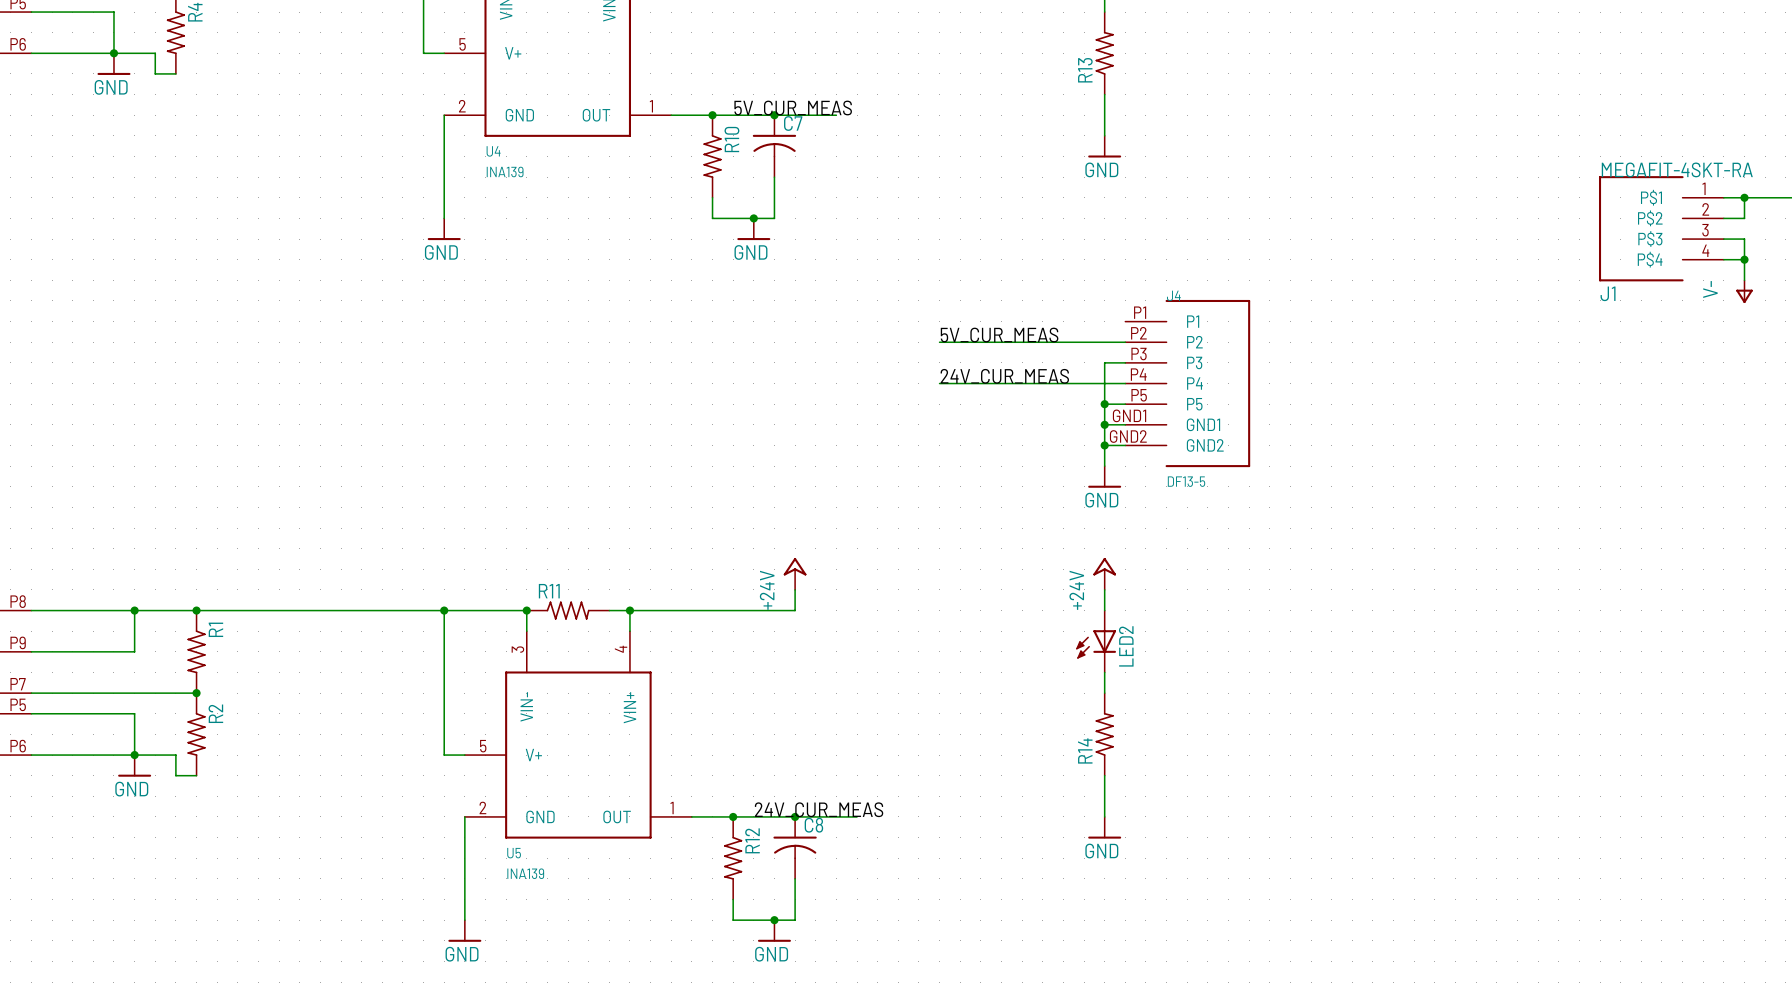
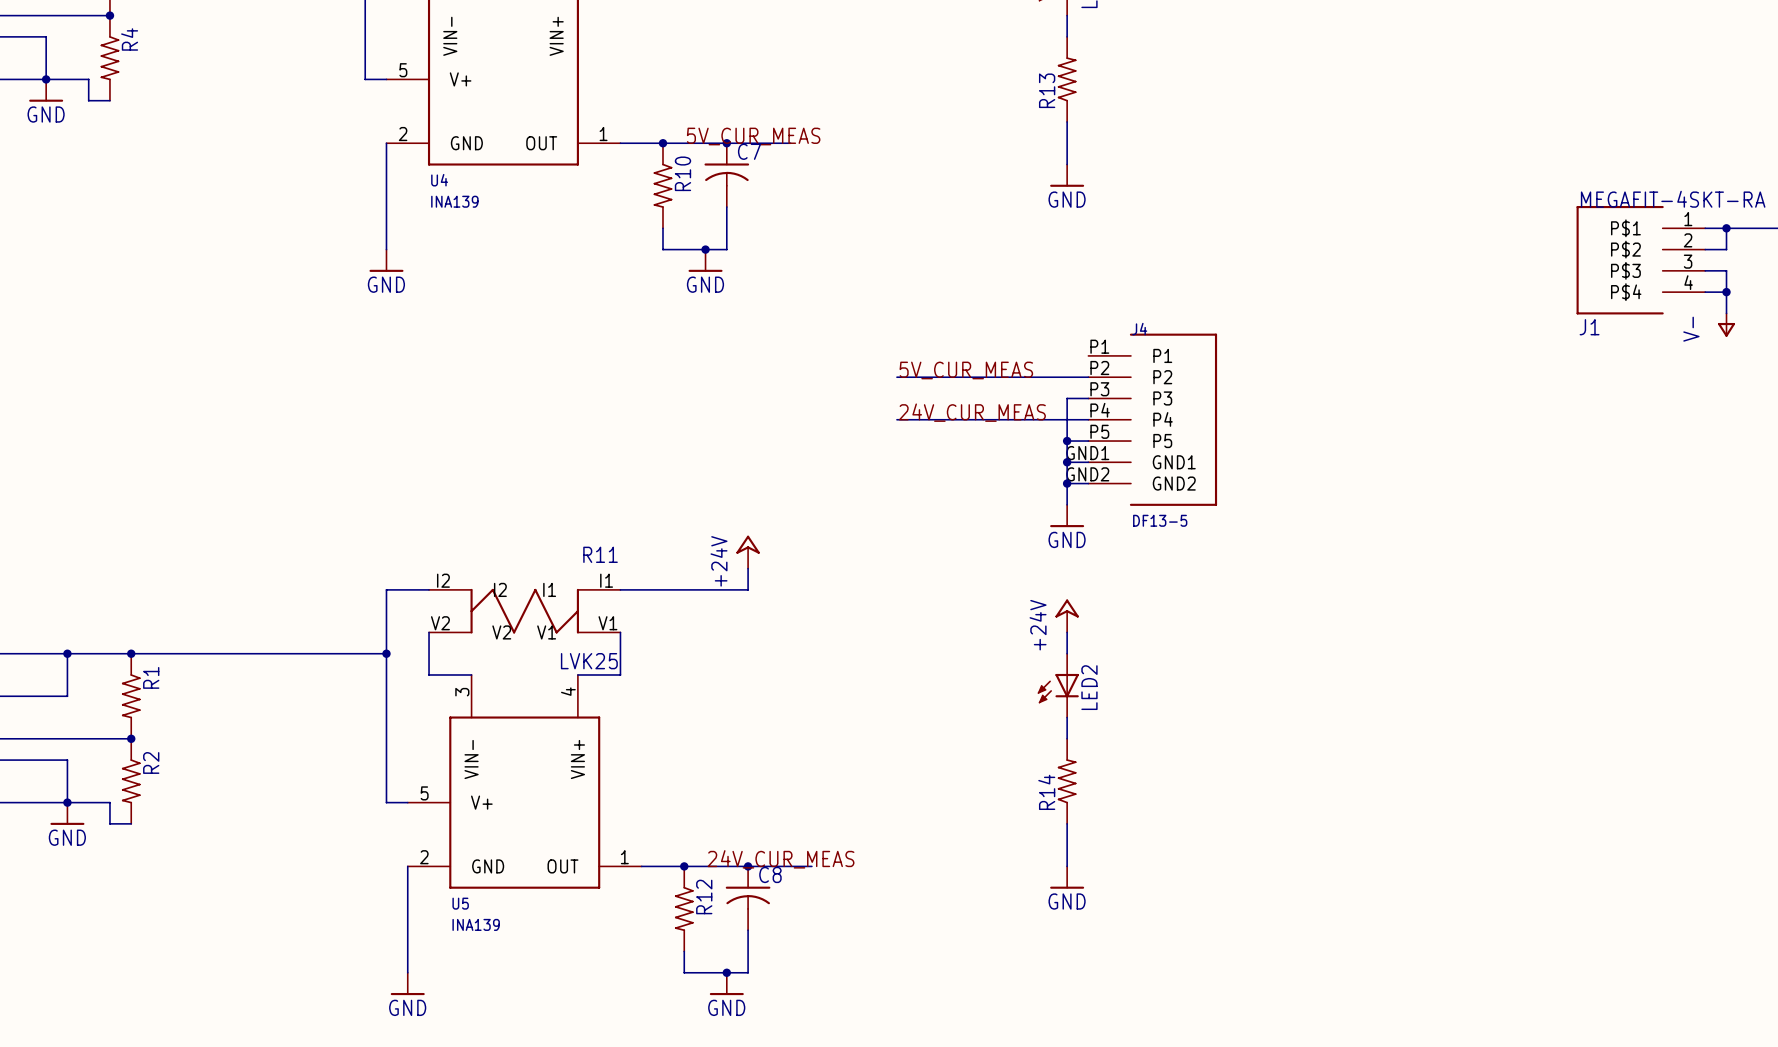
wire: none -> (748, 568) (748, 589) (620, 589)
wire: none -> (429, 589) (386, 589) (386, 653)
power symbol position: +24V (795, 573) -> +24V (748, 552)
wire: (795, 589) (795, 610) (609, 610) -> none
R11 name position: R11 (549, 591) -> R11 (600, 554)
R11 symbol: [526, 601, 610, 620] -> [429, 588, 621, 634]
wire: (444, 610) (526, 610) (526, 631) -> (429, 632) (429, 674) (471, 674)
junction: (526, 610) -> none
wire: (629, 610) (629, 631) -> (620, 632) (620, 674) (577, 674)
junction: (629, 610) -> none
R11 value: none -> LVK25 (589, 661)

